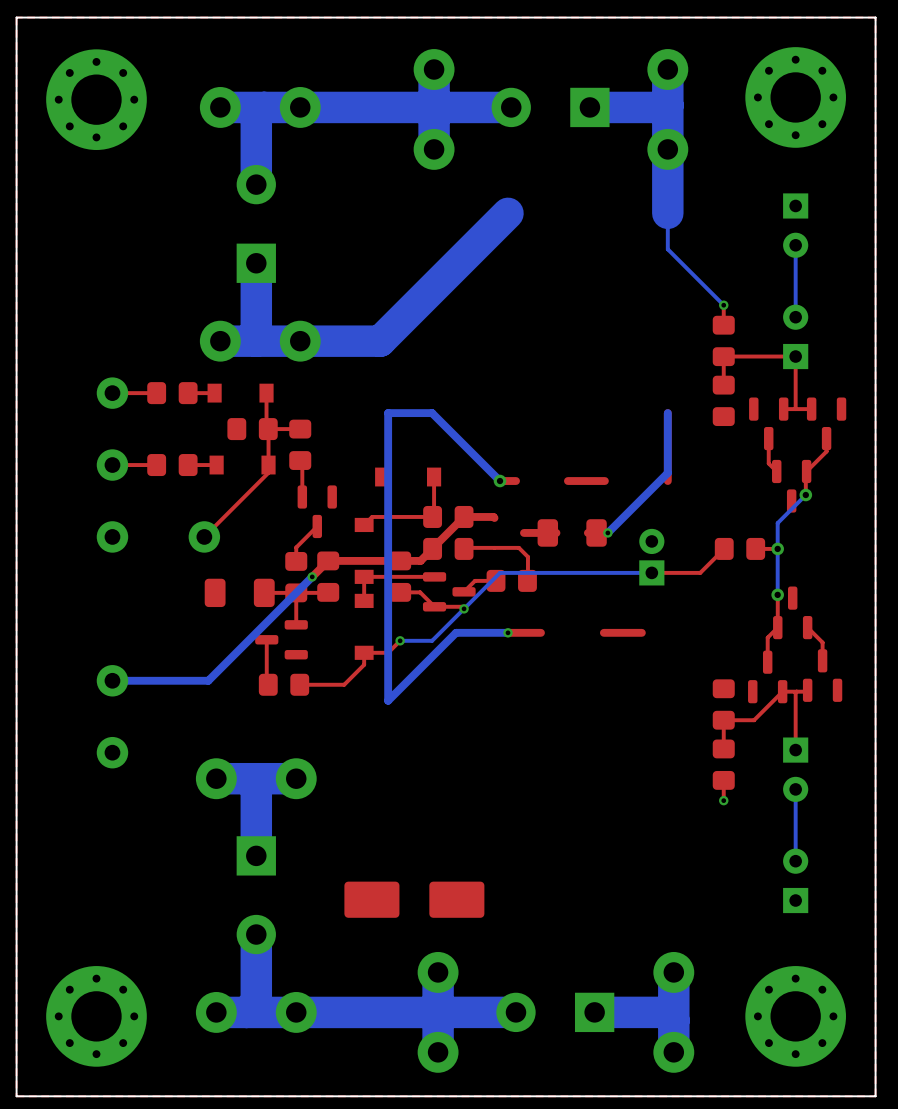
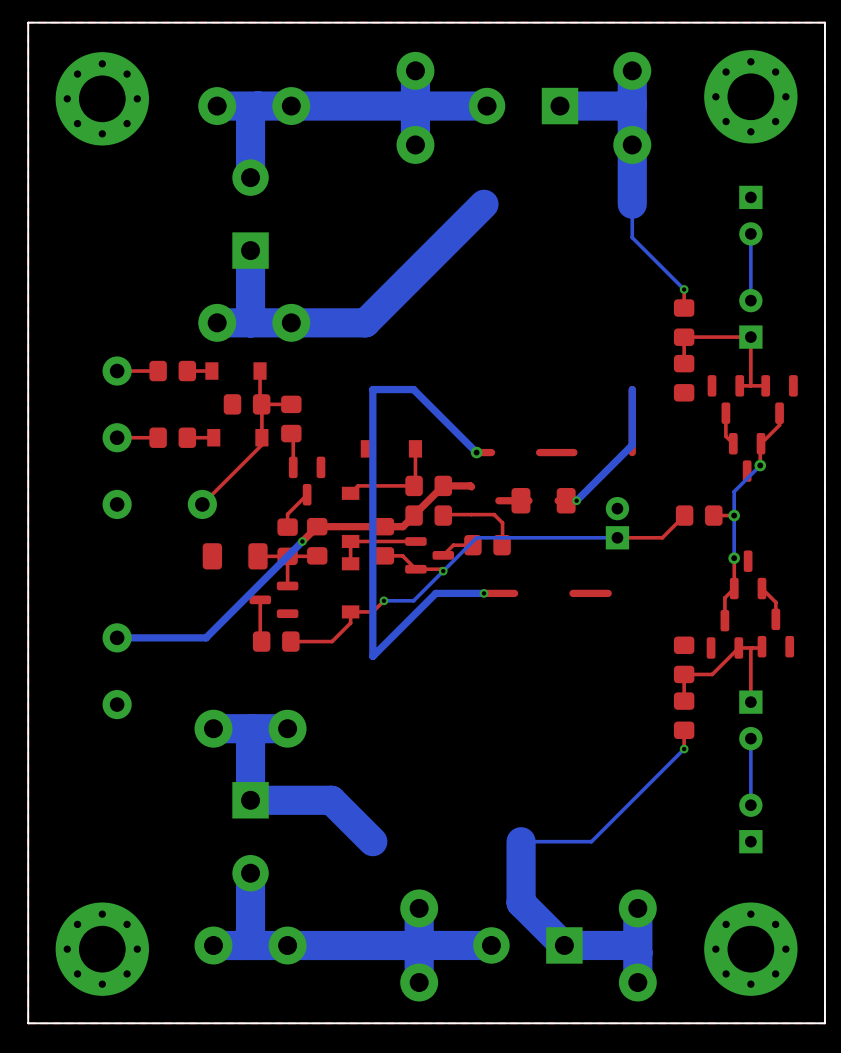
bottom track: none -> (684, 749) (591, 841) (521, 841) (521, 902) (563, 945)
bottom track: none -> (250, 800) (331, 800) (372, 841)
part: (414, 899) -> none

